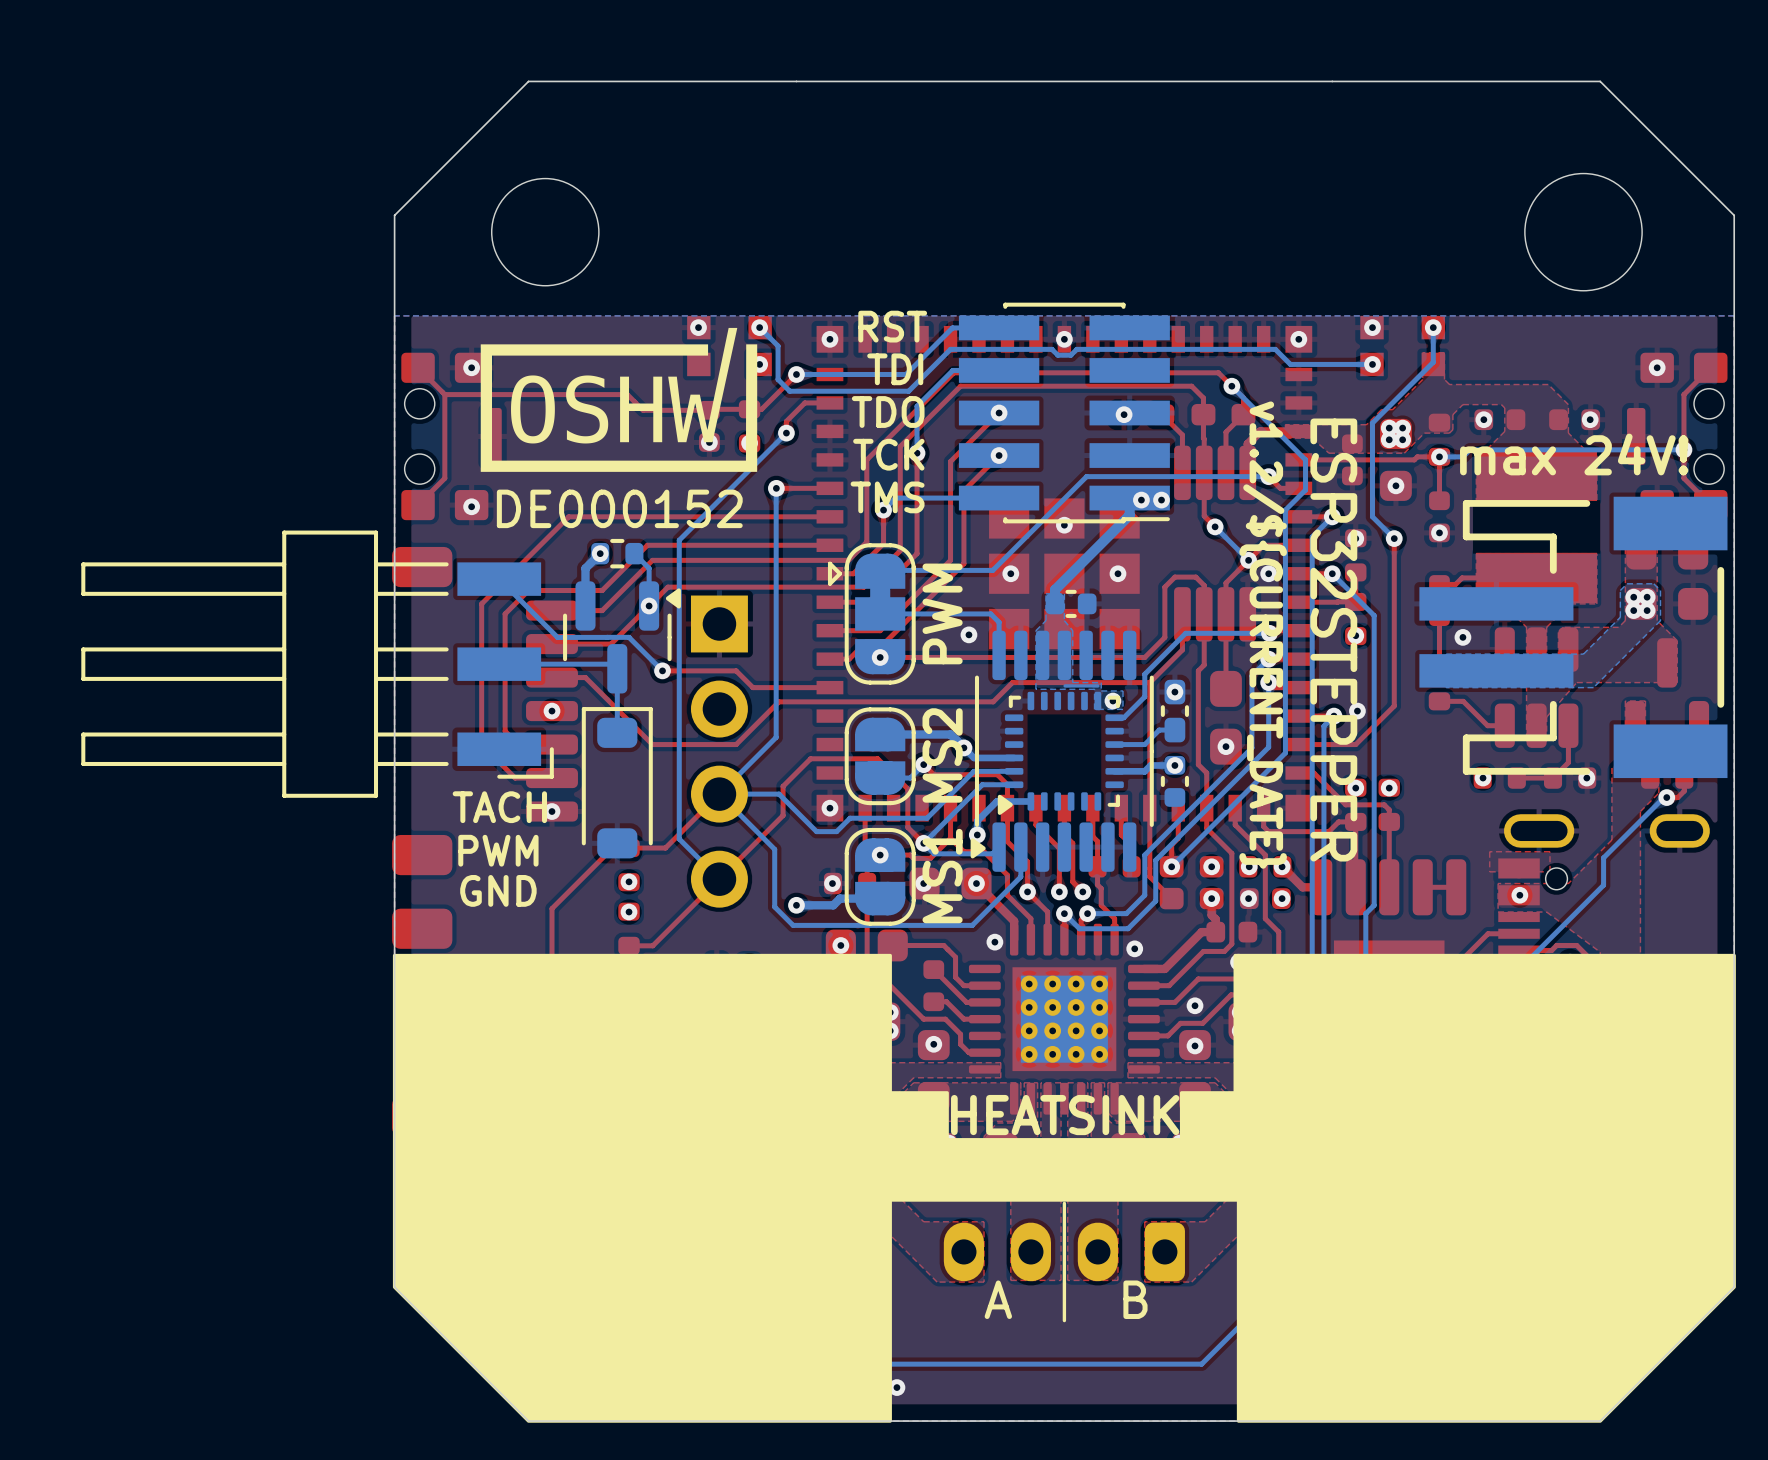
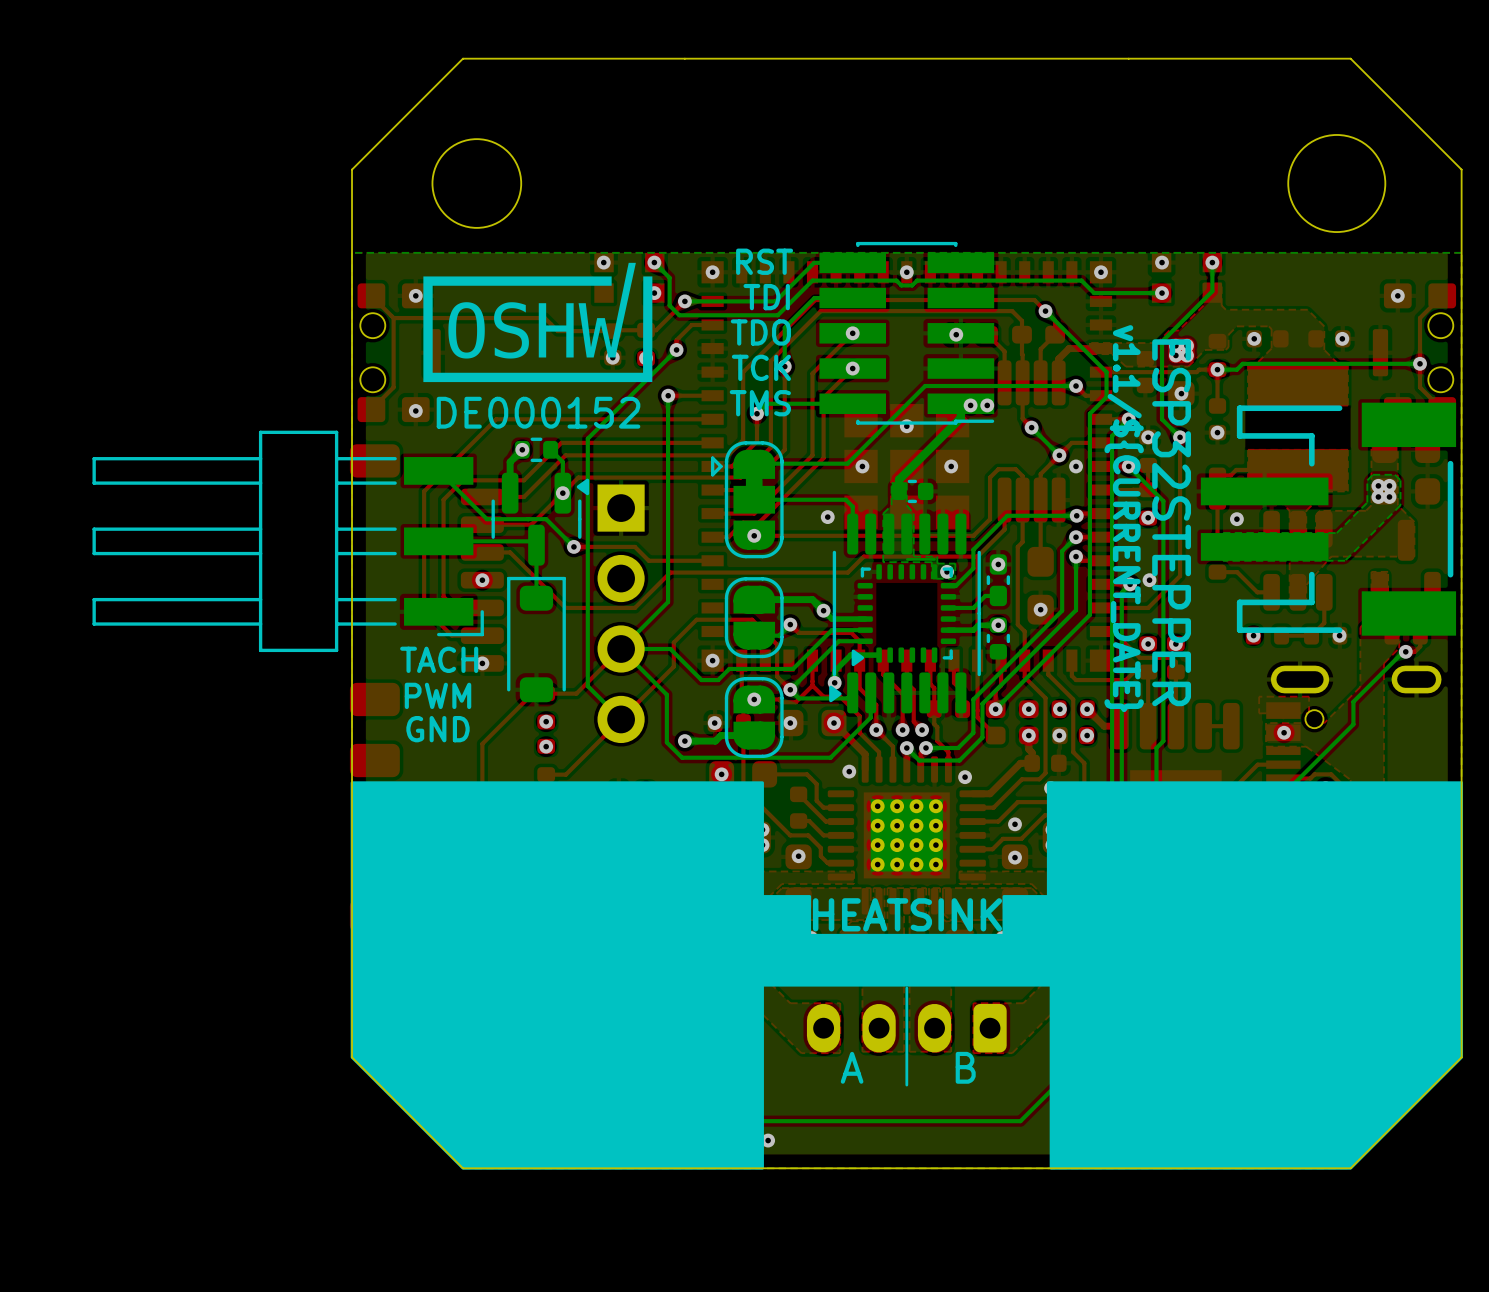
text: max 24V! (1574, 454) -> none
part value: PWM (942, 613) -> none
text: v1.2/${CURRENT_DATE} (1263, 635) -> none
text: ESP32STEPPER (1333, 640) -> v1.1/${CURRENT_DATE} (1124, 518)
text: none -> ESP32STEPPER (1171, 522)
part value: MS2 (942, 755) -> none
part value: MS1 (942, 876) -> none

